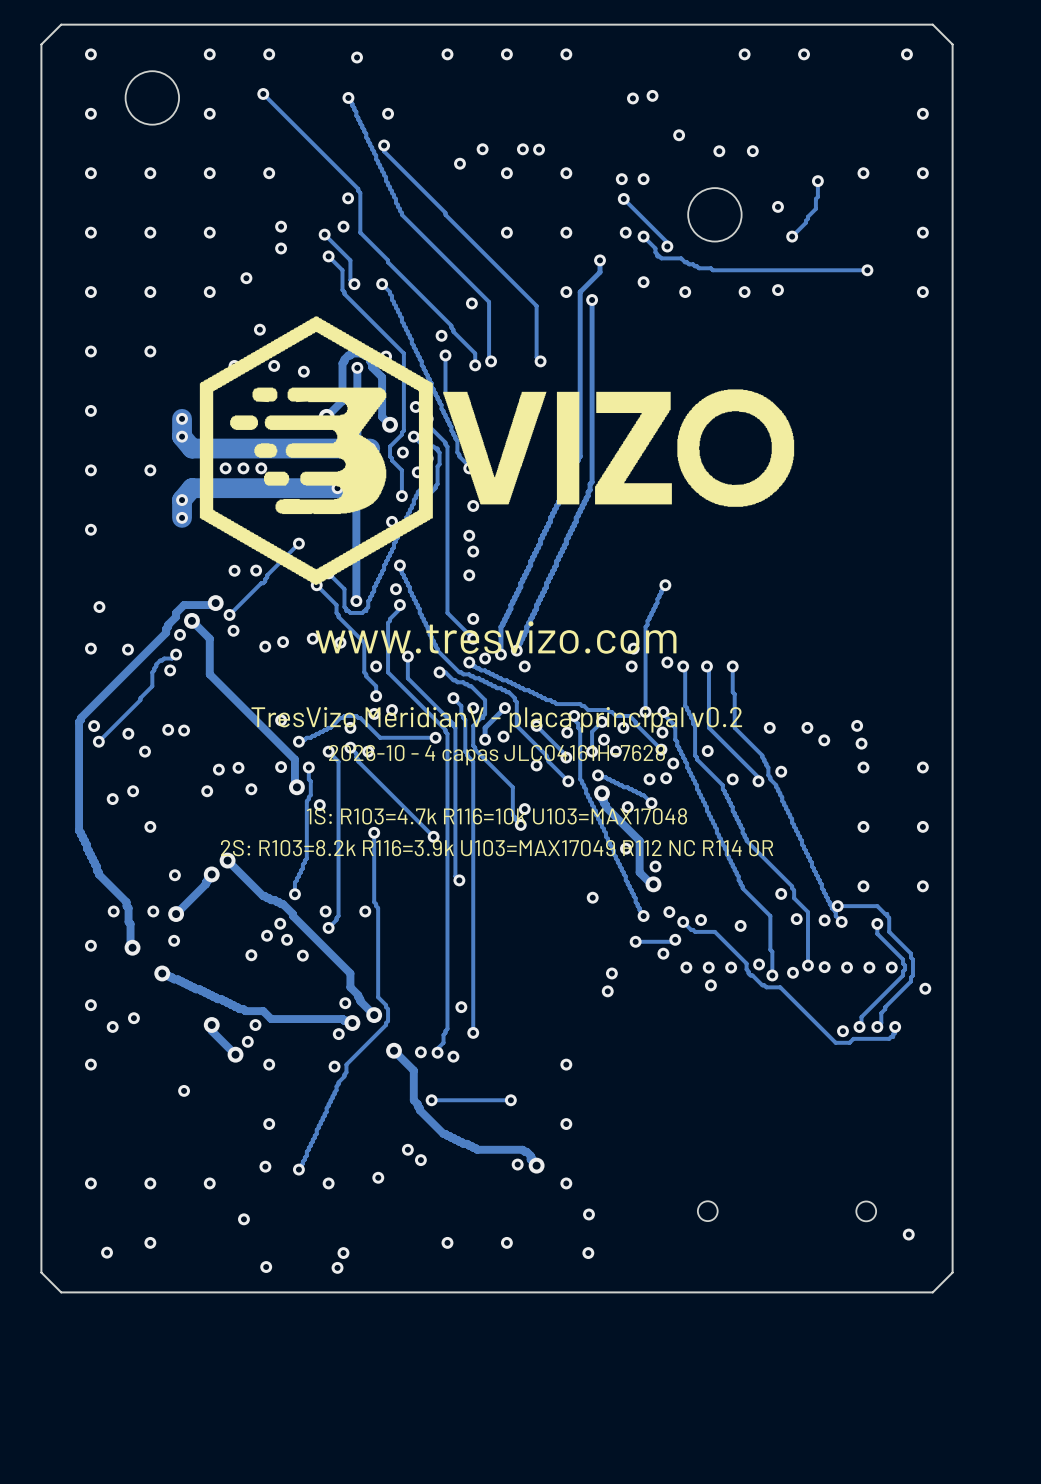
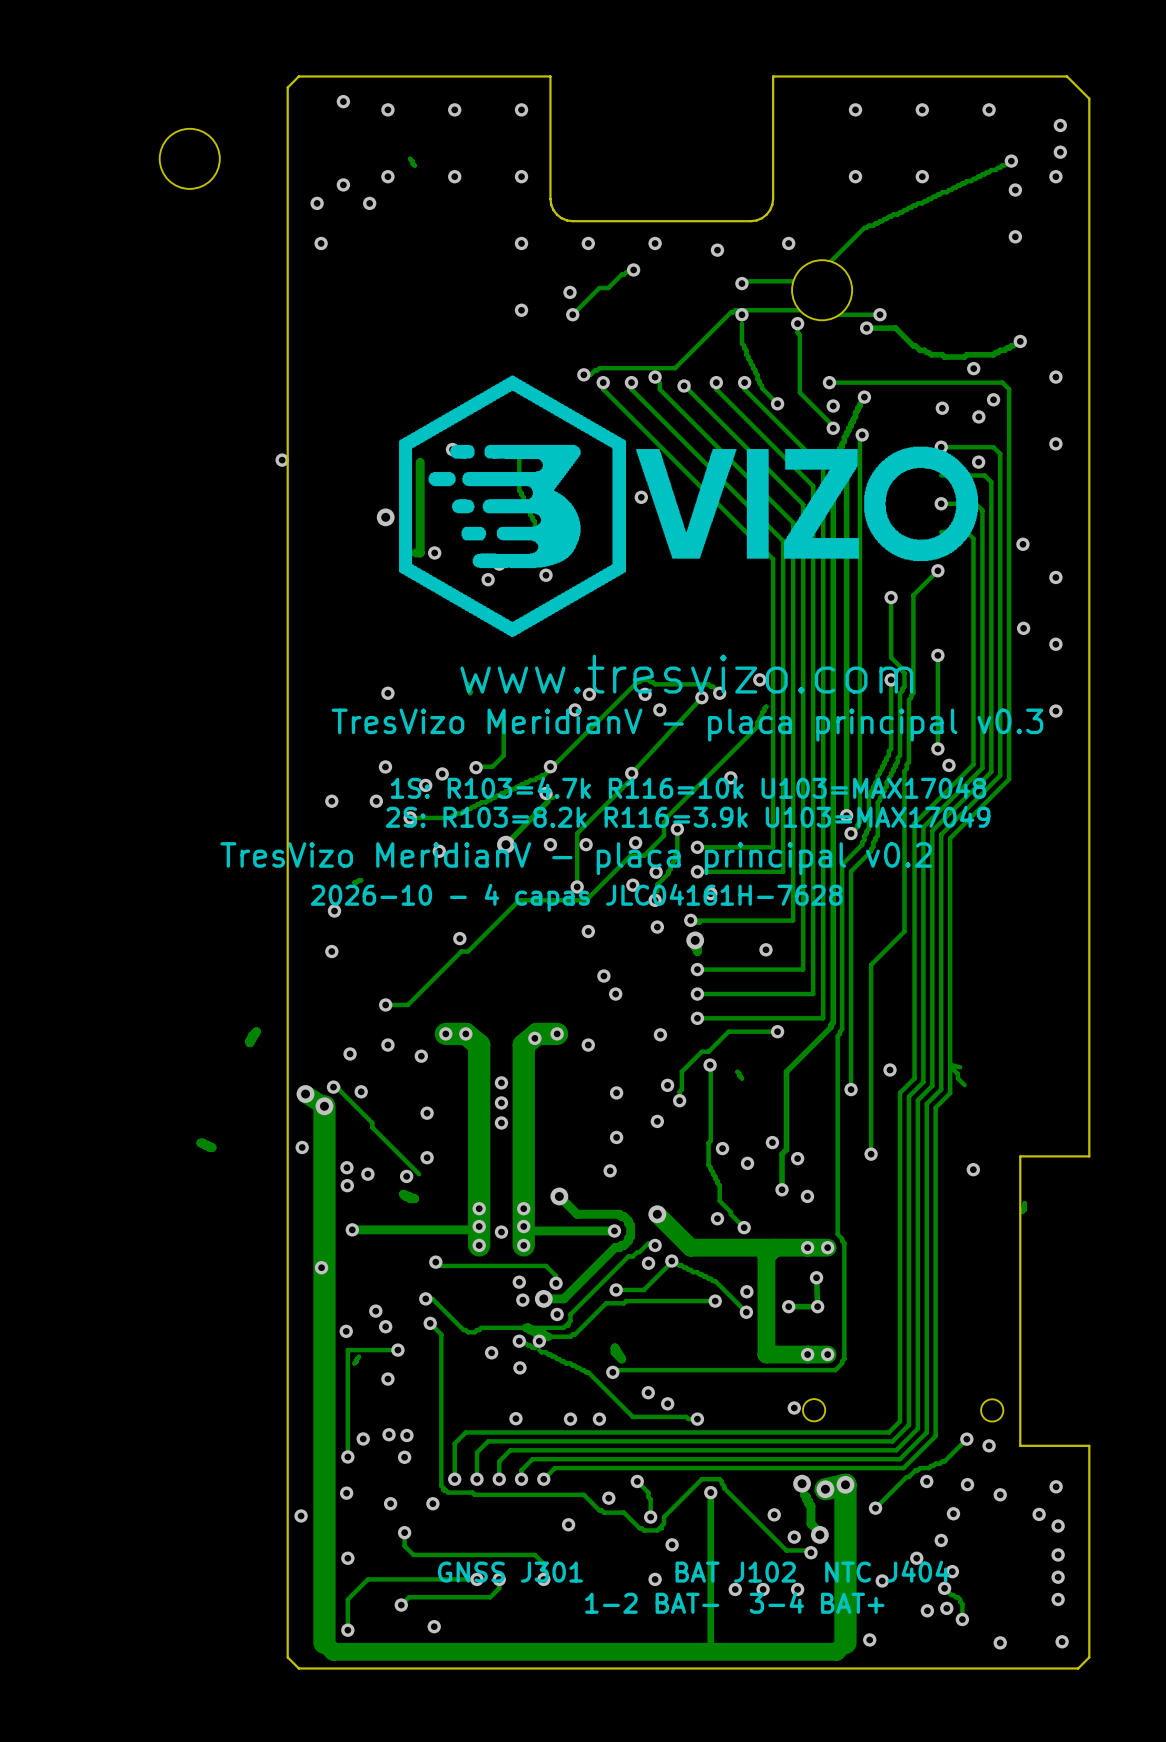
board edge: (249, 24) (61, 24) (41, 44) (41, 1272) (61, 1292) (932, 1292) (952, 1272) -> (298, 76) (287, 87) (287, 1657) (298, 1668) (1078, 1668) (1089, 1657) (1089, 1479)
board edge: (671, 24) (473, 24) -> (773, 76) (772, 204) (766, 214) (761, 218) (750, 221) (572, 221) (561, 218) (553, 210) (550, 198) (550, 76)
via: (90, 54) -> none
via: (209, 54) -> none
via position: (269, 54) -> (343, 101)
via: none -> (387, 109)
via: none -> (454, 109)
via: (506, 54) -> none
via: (566, 54) -> none
via: none -> (989, 109)
via: (906, 54) -> none
via: (357, 57) -> none
via: none -> (1060, 125)
via: none -> (1060, 152)
track: (263, 93) (358, 189) (360, 193) (360, 232) (451, 325) (453, 331) (475, 353) (475, 365) -> none
via: (263, 93) -> none
via: (652, 95) -> none
via: (348, 97) -> none
via: (632, 98) -> none
via: none -> (1011, 161)
track: (352, 103) (401, 214) (489, 301) (489, 359) (491, 361) -> none
track: none -> (1004, 165) (991, 170) (971, 181) (966, 181) (946, 192) (942, 192) (922, 203) (917, 203) (897, 214) (893, 214) (873, 225) (864, 227) (810, 281) (748, 281)
via: (90, 113) -> none
via: (209, 113) -> none
via: none -> (387, 176)
via: none -> (521, 176)
via: none -> (855, 176)
via: none -> (922, 176)
via: none -> (343, 184)
via: none -> (1015, 190)
via: (679, 135) -> none
via: none -> (317, 203)
via: none -> (369, 203)
track: (384, 145) (384, 151) (536, 305) (536, 357) (540, 361) -> none
via: (384, 145) -> none
via: (482, 149) -> none
via: (522, 149) -> none
via: (539, 149) -> none
via: (719, 151) -> none
via: (752, 151) -> none
via position: (459, 163) -> (521, 243)
via: none -> (1015, 236)
via: (90, 173) -> none
via: (150, 173) -> none
via: (209, 173) -> none
via: none -> (788, 243)
via: (863, 173) -> none
via: (922, 173) -> none
via: (643, 179) -> none
track: (817, 181) (815, 208) (808, 216) (806, 222) (792, 236) -> none
via: (817, 181) -> none
track: none -> (633, 269) (621, 274) (608, 288) (599, 288) (572, 314)
via: none -> (633, 269)
via: (348, 198) -> none
track: (623, 198) (667, 242) (667, 246) -> none
via: (623, 198) -> none
via: (777, 206) -> none
via: none -> (741, 283)
via: none -> (570, 292)
via: (281, 226) -> none
via: (343, 226) -> none
via: (90, 232) -> none
via: (150, 232) -> none
via: (209, 232) -> none
via: none -> (521, 310)
via: (506, 232) -> none
via: (566, 232) -> none
via: (625, 232) -> none
via: (922, 232) -> none
track: (324, 234) (350, 260) (350, 280) (354, 284) -> none
via: (324, 234) -> none
via: none -> (572, 314)
track: (643, 236) (655, 248) (657, 256) (661, 258) (681, 258) (685, 262) (699, 268) (710, 268) (712, 270) (808, 270) -> (866, 328) (895, 328) (913, 345) (926, 352)
track: none -> (880, 314) (810, 314) (804, 310) (735, 310) (675, 368) (599, 368) (590, 374) (583, 374)
via: none -> (880, 314)
via: (792, 236) -> none
track: none -> (741, 323) (741, 343) (746, 350) (746, 354) (757, 374) (761, 388) (777, 403)
track: none -> (797, 323) (797, 332) (799, 334) (799, 392) (833, 426) (833, 428)
via: none -> (797, 323)
via: (667, 246) -> none
via: (281, 248) -> none
via: none -> (866, 328)
track: (328, 256) (342, 270) (342, 290) (344, 294) (403, 353) (403, 430) (390, 446) (392, 460) (401, 470) (401, 496) -> none
via: (328, 256) -> none
track: (600, 260) (600, 272) (580, 292) (580, 456) (514, 599) -> (719, 693) (708, 684) (655, 684) (648, 679) (641, 679) (597, 722)
via: (600, 260) -> none
via: none -> (1020, 341)
track: (867, 270) (809, 270) -> (1013, 345) (993, 354) (944, 357) (942, 354) (931, 354) (928, 352)
via: (867, 270) -> none
via: (246, 278) -> none
via: (643, 282) -> none
via: (354, 284) -> none
track: (382, 284) (392, 296) (392, 299) (441, 404) (441, 408) (451, 426) (451, 430) (457, 440) (457, 452) (469, 468) -> none
via: (382, 284) -> none
via: none -> (973, 368)
drawing: none -> [399, 375, 978, 638]
via: none -> (583, 374)
via: (777, 290) -> none
via: (90, 292) -> none
via: (150, 292) -> none
via: (209, 292) -> none
via: (685, 292) -> none
via: (744, 292) -> none
track: none -> (603, 382) (603, 389) (773, 559) (773, 847) (697, 847)
via: none -> (603, 382)
track: none -> (631, 382) (631, 389) (783, 540) (783, 871) (697, 871)
via: none -> (631, 382)
track: none -> (688, 382) (688, 389) (803, 504) (803, 969) (697, 969)
track: none -> (716, 382) (716, 389) (813, 486) (813, 955)
via: none -> (716, 382)
track: none -> (744, 382) (744, 389) (823, 467) (823, 1018) (697, 1018)
via: none -> (744, 382)
track: none -> (829, 382) (1002, 382) (1009, 389) (1009, 779) (950, 838) (950, 1093) (935, 1107) (935, 1436) (903, 1468) (554, 1468) (543, 1479)
via: none -> (829, 382)
track: (592, 299) (592, 482) (588, 496) (576, 517) (576, 521) (518, 644) -> none
via: (471, 303) -> none
via: none -> (864, 397)
via: none -> (993, 399)
via: none -> (777, 403)
drawing: [199, 316, 795, 585] -> none
via: none -> (833, 406)
via: none -> (942, 408)
via: none -> (978, 416)
via: (259, 329) -> none
via: (441, 335) -> none
via: none -> (833, 428)
track: none -> (862, 434) (859, 437) (859, 822) (851, 833)
via: none -> (862, 434)
via: (90, 351) -> none
via: (150, 351) -> none
via: none -> (1055, 443)
via: none -> (941, 447)
via: (445, 355) -> none
via: (491, 361) -> none
via: (540, 361) -> none
via: (274, 365) -> none
via: (475, 365) -> none
via: (357, 367) -> none
via: none -> (978, 462)
via: (303, 371) -> none
track: none -> (846, 468) (846, 815)
track: none -> (941, 475) (984, 475) (991, 482) (991, 771) (932, 830) (932, 1085) (917, 1100) (917, 1428) (896, 1450) (510, 1450) (499, 1461) (499, 1479)
via: none -> (641, 497)
track: none -> (941, 503) (975, 503) (982, 510) (982, 768) (923, 827) (923, 1082) (908, 1096) (908, 1425) (892, 1441) (488, 1441) (476, 1452) (476, 1479)
via: none -> (941, 503)
via: (415, 406) -> none
via: (90, 410) -> none
track: (326, 416) (342, 401) (342, 363) (344, 359) (352, 353) (362, 353) (370, 359) (372, 367) (382, 377) (382, 416) (390, 424) -> none
track: (182, 418) (182, 436) (191, 448) (370, 448) -> none
via: (182, 418) -> none
track: (427, 418) (427, 424) (447, 446) (447, 612) (473, 638) -> none
via: (390, 424) -> none
track: none -> (941, 532) (966, 532) (973, 538) (973, 764) (914, 823) (914, 1078) (900, 1092) (900, 1421) (888, 1432) (465, 1432) (454, 1443) (454, 1479)
via: (182, 436) -> none
track: (413, 436) (423, 446) (433, 446) (439, 452) (437, 484) (425, 498) (421, 509) -> none
via: (413, 436) -> none
via: none -> (1022, 544)
via: (402, 452) -> none
track: (427, 458) (429, 460) (429, 478) (413, 500) (413, 504) (368, 601) (366, 610) (362, 612) (346, 610) (344, 607) (344, 589) (328, 573) -> none
track: none -> (937, 570) (913, 595) (913, 693) (908, 699) (908, 762) (904, 771) (904, 931) (871, 964) (871, 1154)
via: none -> (937, 570)
via: (225, 468) -> none
via: (243, 468) -> none
via: (261, 468) -> none
via: (90, 470) -> none
via: (150, 470) -> none
via: none -> (1055, 577)
via: (337, 488) -> none
track: (356, 488) (356, 601) -> none
track: (370, 488) (191, 488) (182, 500) (182, 517) -> none
via: none -> (891, 597)
via: (401, 496) -> none
via: (182, 500) -> none
via: (473, 506) -> none
via: none -> (1023, 628)
via: (182, 517) -> none
via: (392, 521) -> none
via: (90, 529) -> none
via: none -> (1055, 644)
via: (469, 535) -> none
track: none -> (937, 655) (937, 748)
via: none -> (937, 655)
track: (298, 543) (267, 575) (265, 581) (229, 614) -> none
via: (298, 543) -> none
via: (473, 551) -> none
via: none -> (759, 679)
via: none -> (891, 679)
via: (399, 565) -> none
via: (234, 570) -> none
via: (256, 570) -> none
track: (401, 573) (437, 650) (459, 672) (479, 678) (508, 692) (516, 702) (516, 725) (546, 755) (548, 761) (568, 781) -> none
via: none -> (719, 693)
via: none -> (589, 694)
via: none -> (645, 694)
via: (469, 575) -> none
track: none -> (701, 697) (631, 773) (630, 780)
via: none -> (701, 697)
track: (316, 585) (336, 605) (338, 616) (364, 642) (364, 672) (376, 686) (376, 696) -> none
via: (316, 585) -> none
via: (665, 585) -> none
via: none -> (574, 709)
via: none -> (659, 709)
via: (395, 589) -> none
via: none -> (1055, 711)
track: none -> (503, 719) (503, 755) (492, 766) (476, 766)
text: none -> TresVizo MeridianV - placa principal v0.3 (687, 725)
via: (356, 601) -> none
track: (512, 601) (510, 609) (500, 626) (500, 654) -> (594, 724) (543, 775) (450, 817) (410, 817)
track: (215, 603) (213, 605) (184, 605) (168, 624) (166, 632) (79, 721) (79, 830) (98, 874) (126, 902) (132, 947) -> none
via: (215, 603) -> none
track: (399, 605) (399, 609) (388, 622) (388, 672) (447, 733) (447, 1028) (443, 1034) (443, 1042) (437, 1048) (437, 1052) -> none
via: (399, 605) -> none
track: (655, 605) (645, 626) (645, 712) -> (755, 728) (666, 817) (664, 822) (664, 835) (643, 855) (630, 855) (588, 898) (583, 900) (519, 900) (468, 951) (461, 951) (407, 1004) (385, 1004)
via: (99, 607) -> none
via: (229, 614) -> none
via: (473, 618) -> none
track: (191, 620) (209, 638) (209, 674) (294, 759) (294, 785) (296, 787) -> none
via: (191, 620) -> none
via: none -> (937, 748)
via: (233, 630) -> none
via: (180, 634) -> none
text position: www.tresvizo.com (496, 637) -> www.tresvizo.com (686, 674)
via: none -> (948, 765)
via: (312, 638) -> none
via: none -> (385, 766)
via: none -> (476, 767)
via: (283, 642) -> none
via: (340, 642) -> none
via: none -> (631, 773)
via: none -> (442, 773)
via: (265, 646) -> none
via: (90, 648) -> none
via: (127, 649) -> none
via: (516, 650) -> none
track: none -> (630, 780) (577, 833) (577, 886)
track: (176, 654) (172, 658) (164, 658) (156, 664) (152, 672) (152, 686) (98, 741) -> none
via: (176, 654) -> none
via: (500, 654) -> none
via: none -> (425, 785)
track: (407, 656) (407, 678) (455, 727) (455, 876) (459, 880) -> none
via: (407, 656) -> none
via: (485, 658) -> none
via: (667, 662) -> none
via: (376, 666) -> none
track: (475, 666) (556, 704) (580, 704) (588, 710) (607, 710) (615, 715) (629, 715) (661, 749) -> none
via: (524, 666) -> none
via: (631, 666) -> none
track: (683, 666) (685, 668) (685, 706) (689, 712) -> (659, 382) (659, 389) (793, 522) (793, 849)
via: (683, 666) -> none
track: (706, 666) (708, 668) (708, 727) (758, 777) (758, 781) -> none
via: (706, 666) -> none
track: (732, 666) (734, 727) (762, 755) (768, 767) (768, 775) (782, 797) (782, 801) (792, 818) (792, 822) (829, 904) -> none
via: (732, 666) -> none
via: none -> (331, 801)
via: none -> (376, 801)
track: none -> (548, 801) (505, 844)
via: (170, 670) -> none
track: (439, 672) (445, 672) (453, 680) (471, 686) (485, 700) (485, 713) (473, 725) (473, 745) (512, 787) (512, 815) (520, 824) -> none
via: (439, 672) -> none
via: none -> (846, 815)
text: none -> 2S: R103=8.2k R116=3.9k U103=MAX17049 (688, 816)
via: none -> (410, 817)
track: none -> (677, 829) (677, 853) (668, 873) (657, 884) (657, 891)
via: none -> (677, 829)
via: (376, 696) -> none
track: (453, 698) (461, 706) (461, 713) (465, 719) (465, 751) (473, 761) (473, 1032) -> none
via: (453, 698) -> none
via: none -> (851, 833)
via: none -> (635, 842)
via: none -> (505, 844)
track: (504, 708) (485, 727) (485, 739) -> none
via: (392, 710) -> none
via: none -> (697, 847)
via: (645, 712) -> none
track: (663, 712) (675, 727) (677, 745) (689, 769) -> (793, 851) (793, 913)
via: (663, 712) -> none
track: (689, 713) (695, 725) (695, 755) (722, 785) (724, 791) -> (859, 403) (855, 417) (844, 437) (844, 441) (833, 461) (833, 938)
track: (574, 715) (574, 719) (580, 729) (580, 779) (639, 910) -> none
via: (574, 715) -> none
via: (281, 720) -> none
track: (601, 721) (592, 731) (592, 751) -> none
via: (601, 721) -> none
track: (536, 725) (566, 757) -> none
via: (536, 725) -> none
via: (857, 725) -> none
via: (94, 726) -> none
via: (350, 727) -> none
via: (623, 727) -> none
via: (769, 727) -> none
via: (807, 727) -> none
via: (168, 729) -> none
via: (184, 730) -> none
via: none -> (697, 871)
via: (662, 732) -> none
via: (128, 733) -> none
via: (503, 736) -> none
track: (435, 737) (380, 737) (360, 717) (344, 715) (330, 727) (304, 739) -> none
via: (435, 737) -> none
via: (485, 739) -> none
via: (603, 739) -> none
via: (824, 740) -> none
via: (98, 741) -> none
via: (298, 741) -> none
via: (861, 743) -> none
via: none -> (632, 885)
via: none -> (577, 886)
track: (350, 747) (356, 753) (358, 761) (433, 836) -> none
via: (350, 747) -> none
via: (661, 749) -> none
via: (145, 751) -> none
track: (328, 751) (338, 761) (338, 916) (328, 927) -> none
via: (328, 751) -> none
via: (368, 751) -> none
via: (592, 751) -> none
via: (707, 751) -> none
via: (673, 763) -> none
via: (536, 765) -> none
via: (238, 767) -> none
track: (308, 767) (310, 795) (306, 801) (306, 858) (294, 882) (294, 894) -> none
via: (308, 767) -> none
via: (863, 767) -> none
via: (922, 767) -> none
via: (218, 769) -> none
track: (689, 771) (706, 807) -> (793, 915) (793, 920) (697, 920)
via: (781, 771) -> none
track: (605, 777) (643, 795) (651, 803) -> none
via: (666, 778) -> none
via: (649, 779) -> none
via: (732, 779) -> none
via: (758, 781) -> none
via: none -> (588, 931)
via: (296, 787) -> none
via: (251, 789) -> none
via: (133, 791) -> none
via: (207, 791) -> none
via: none -> (459, 938)
track: (724, 793) (732, 807) -> (891, 679) (891, 748) (868, 795) (868, 829) (864, 835) (864, 840) (842, 864) (842, 955)
via: (112, 799) -> none
via: none -> (765, 949)
via: none -> (331, 951)
track: (603, 803) (639, 840) (639, 872) (653, 884) -> none
via: (651, 803) -> none
via: (319, 805) -> none
via: (627, 807) -> none
via: (524, 809) -> none
track: (706, 811) (724, 846) -> (833, 940) (833, 1000)
track: none -> (813, 960) (813, 994) (697, 994)
track: (732, 811) (740, 824) -> (891, 597) (891, 657) (904, 673) (904, 686) (900, 693) (900, 755) (877, 802) (877, 835) (873, 842) (873, 846) (851, 871) (851, 976)
text position: 1S: R103=4.7k R116=10k U103=MAX17048 (496, 816) -> 1S: R103=4.7k R116=10k U103=MAX17048 (688, 787)
via: none -> (697, 969)
via: (150, 826) -> none
track: (740, 826) (746, 840) (792, 886) (794, 898) (808, 912) (808, 938) -> (941, 447) (993, 447) (1000, 453) (1000, 775) (941, 834) (941, 1089) (926, 1103)
via: (863, 826) -> none
via: (922, 826) -> none
track: (374, 832) (374, 902) (378, 908) (378, 997) (388, 1009) (388, 1021) (346, 1064) (346, 1072) (336, 1086) (336, 1090) (326, 1108) (326, 1112) (316, 1129) (316, 1133) (302, 1163) -> none
via: (374, 832) -> none
via: (433, 836) -> none
via: none -> (615, 994)
via: none -> (697, 994)
text: 2S: R103=8.2k R116=3.9k U103=MAX17049 R112 NC R114 0R (497, 848) -> none
via: (625, 848) -> none
track: (724, 848) (732, 864) -> (842, 960) (842, 1020)
track: none -> (833, 1002) (833, 1022) (831, 1027) (786, 1071) (786, 1149) (782, 1154) (782, 1189)
via: none -> (385, 1004)
track: (227, 860) (263, 896) (283, 904) (350, 973) (350, 987) (358, 995) (360, 1001) (374, 1015) -> none
via: (227, 860) -> none
via: none -> (697, 1018)
via: (655, 866) -> none
track: (732, 866) (740, 882) -> (851, 978) (851, 1040)
track: none -> (842, 1022) (842, 1029) (837, 1036) (837, 1234) (844, 1243) (844, 1359) (842, 1363) (835, 1370) (615, 1370) (612, 1372)
via: (211, 874) -> none
track: none -> (777, 1031) (728, 1031) (708, 1051) (701, 1051) (681, 1071) (679, 1100)
via: none -> (777, 1031)
via: (174, 875) -> none
track: none -> (445, 1033) (465, 1033) (479, 1045) (479, 1245)
via: none -> (445, 1033)
via: none -> (465, 1033)
track: none -> (557, 1033) (537, 1033) (523, 1045) (523, 1245)
via: none -> (557, 1033)
via: none -> (660, 1034)
track: (205, 884) (176, 914) -> none
via: (653, 884) -> none
track: (740, 884) (770, 916) (772, 975) -> (851, 1042) (851, 1085)
via: none -> (387, 1045)
via: none -> (588, 1045)
via: (863, 886) -> none
via: (922, 886) -> none
via: (781, 893) -> none
via: (592, 897) -> none
track: none -> (710, 1065) (710, 1140) (708, 1143) (708, 1165) (719, 1185) (719, 1200) (744, 1227)
via: none -> (710, 1065)
via: (837, 906) -> none
via: none -> (890, 1069)
via: (113, 911) -> none
via: (153, 911) -> none
via: (325, 911) -> none
via position: (365, 911) -> (421, 1056)
via: (669, 912) -> none
track: (835, 912) (837, 906) (877, 906) (889, 918) (889, 931) (911, 953) (912, 959) (911, 981) (885, 1007) (881, 1013) (881, 1023) (877, 1026) -> none
via: (176, 914) -> none
via: (643, 916) -> none
via: (796, 919) -> none
via: none -> (501, 1082)
via: (701, 920) -> none
via: (824, 920) -> none
track: (683, 921) (695, 931) (714, 931) (746, 963) (746, 969) (750, 975) (766, 987) (780, 987) (835, 1042) (849, 1042) (853, 1038) (889, 1038) (893, 1034) -> none
via: (683, 921) -> none
via: (841, 921) -> none
via: none -> (667, 1085)
track: none -> (338, 1087) (338, 1089) (372, 1122) (372, 1127) (419, 1174)
track: (877, 923) (877, 933) (903, 959) (905, 969) (903, 975) (861, 1017) (861, 1024) (859, 1026) -> none
via: (877, 923) -> none
via: none -> (361, 1091)
via: (328, 927) -> none
via: none -> (616, 1092)
track: none -> (305, 1094) (324, 1106) (324, 1642) (333, 1651) (836, 1651) (845, 1642) (845, 1484) (825, 1489)
via: none -> (305, 1094)
via: (267, 935) -> none
via: none -> (679, 1100)
via: none -> (501, 1102)
via: (287, 939) -> none
track: (675, 939) (673, 941) (635, 941) -> none
via: (675, 939) -> none
via: (174, 940) -> none
via: none -> (324, 1106)
via: (635, 941) -> none
via: (90, 945) -> none
via: none -> (427, 1113)
via: (132, 947) -> none
via: (663, 953) -> none
via: none -> (657, 1121)
via: (251, 955) -> none
via: (302, 955) -> none
via: none -> (501, 1122)
via: (759, 964) -> none
track: none -> (926, 1134) (926, 1432) (899, 1459) (532, 1459) (521, 1470) (521, 1479)
via: (808, 965) -> none
via: (686, 967) -> none
via: (708, 967) -> none
via: (731, 967) -> none
via: (824, 967) -> none
via: (847, 967) -> none
via: (869, 967) -> none
via: (891, 967) -> none
via: none -> (616, 1137)
via: (792, 972) -> none
via: (162, 973) -> none
via: (611, 973) -> none
via: none -> (772, 1142)
via: (772, 975) -> none
track: (172, 977) (239, 1009) (263, 1011) (271, 1019) (342, 1019) -> none
via: none -> (302, 1147)
via: none -> (722, 1148)
via: none -> (871, 1154)
via: (710, 985) -> none
board edge: (952, 985) (952, 1242) -> (1089, 1156) (1020, 1156) (1020, 1445) (1089, 1445)
via: none -> (427, 1157)
via: none -> (797, 1158)
via: (925, 988) -> none
via: (607, 991) -> none
via: none -> (747, 1163)
via: none -> (346, 1167)
via: none -> (973, 1169)
via: none -> (610, 1170)
via: none -> (367, 1174)
via: (90, 1005) -> none
via: (461, 1007) -> none
via: none -> (347, 1185)
via: (374, 1015) -> none
via: none -> (782, 1189)
via: (133, 1018) -> none
via: none -> (807, 1196)
track: none -> (559, 1196) (577, 1214) (619, 1214) (623, 1216) (630, 1225) (630, 1236) (623, 1245) (615, 1247) (563, 1298) (543, 1298)
via: (352, 1023) -> none
track: (211, 1024) (211, 1030) (235, 1054) -> none
via: (211, 1024) -> none
via: (255, 1025) -> none
via: (112, 1026) -> none
via: (859, 1026) -> none
via: (877, 1026) -> none
via: (895, 1026) -> none
via: none -> (479, 1208)
via: none -> (523, 1208)
via: (842, 1031) -> none
via position: (473, 1032) -> (559, 1196)
via: (338, 1034) -> none
track: none -> (657, 1214) (690, 1247) (827, 1247)
via: none -> (657, 1214)
via: none -> (717, 1218)
via: (247, 1041) -> none
via: none -> (479, 1226)
track: none -> (523, 1226) (523, 1230) (614, 1230)
via: none -> (523, 1226)
via: none -> (744, 1227)
via: none -> (352, 1229)
track: (394, 1050) (413, 1070) (413, 1100) (419, 1110) (443, 1133) (451, 1137) -> (425, 1298) (432, 1298) (468, 1332) (474, 1332) (481, 1327) (525, 1327)
via: (394, 1050) -> none
track: none -> (479, 1229) (352, 1229)
via: none -> (614, 1230)
via: (420, 1052) -> none
via: none -> (501, 1232)
via: (437, 1052) -> none
via: (235, 1054) -> none
via: (453, 1056) -> none
track: none -> (648, 1243) (639, 1252) (632, 1256) (628, 1256) (570, 1314) (568, 1325) (563, 1327) (528, 1327)
via: (90, 1064) -> none
via: (269, 1064) -> none
via: none -> (479, 1245)
via: none -> (523, 1245)
via: (334, 1066) -> none
track: none -> (775, 1247) (766, 1256) (766, 1354) (827, 1354)
via: none -> (807, 1247)
via: none -> (827, 1247)
via: none -> (671, 1261)
track: none -> (435, 1262) (439, 1265) (546, 1265) (556, 1275) (556, 1283)
via: none -> (435, 1262)
via: none -> (648, 1263)
via: none -> (321, 1267)
via: (184, 1090) -> none
track: none -> (816, 1277) (817, 1306) (788, 1306)
via: none -> (816, 1277)
via: none -> (519, 1282)
via: none -> (556, 1283)
via: (431, 1100) -> none
track: (510, 1100) (431, 1100) -> none
via: (510, 1100) -> none
track: none -> (616, 1289) (643, 1289) (671, 1261) (715, 1281) (746, 1312)
via: none -> (616, 1289)
via: none -> (746, 1291)
via: none -> (425, 1298)
via: none -> (543, 1298)
via: none -> (522, 1300)
via: none -> (715, 1301)
via: none -> (788, 1306)
via: none -> (817, 1306)
via: none -> (375, 1311)
via: (269, 1124) -> none
via: (566, 1124) -> none
via: none -> (746, 1312)
via: none -> (557, 1314)
track: none -> (430, 1323) (441, 1334) (441, 1485) (443, 1490) (448, 1492) (472, 1492) (474, 1494) (583, 1494) (603, 1512) (623, 1512) (639, 1528) (643, 1530) (657, 1530) (661, 1528) (664, 1523) (664, 1517) (701, 1479) (719, 1479) (724, 1488) (786, 1550) (808, 1550) (810, 1552)
via: none -> (430, 1323)
via: none -> (385, 1326)
via: none -> (346, 1331)
track: (471, 1145) (477, 1149) (522, 1149) (530, 1155) -> (548, 1336) (570, 1336) (574, 1334) (606, 1303) (623, 1303) (626, 1301) (715, 1301)
via: (407, 1149) -> none
via: none -> (519, 1341)
track: none -> (539, 1341) (534, 1347) (525, 1343)
via: none -> (539, 1341)
track: none -> (397, 1350) (347, 1350) (347, 1456)
via: none -> (397, 1350)
track: none -> (539, 1350) (588, 1372) (632, 1416) (686, 1416) (688, 1419) (697, 1419)
via: none -> (807, 1354)
via: none -> (827, 1354)
via position: (517, 1164) -> (612, 1372)
via: (536, 1165) -> none
via: (265, 1166) -> none
via: (298, 1169) -> none
via: none -> (519, 1367)
via: (378, 1177) -> none
via: (90, 1183) -> none
via: (150, 1183) -> none
via: (209, 1183) -> none
via: (566, 1183) -> none
via: none -> (648, 1392)
via: none -> (794, 1407)
via position: (588, 1214) -> (667, 1403)
via: none -> (515, 1418)
via: (243, 1219) -> none
via: none -> (570, 1419)
via: none -> (599, 1419)
via: none -> (697, 1419)
via: none -> (389, 1434)
via: none -> (406, 1435)
via: (908, 1234) -> none
via: none -> (363, 1438)
track: none -> (966, 1439) (944, 1461) (928, 1468) (920, 1468) (906, 1477) (875, 1508)
via: none -> (966, 1439)
via: (150, 1242) -> none
via: (447, 1242) -> none
via: (506, 1242) -> none
via: none -> (989, 1445)
via: (107, 1252) -> none
via: none -> (347, 1456)
via: (588, 1253) -> none
via: (266, 1267) -> none
via: (337, 1267) -> none
via: none -> (454, 1479)
via: none -> (476, 1479)
via: none -> (499, 1479)
via: none -> (521, 1479)
via: none -> (543, 1479)
track: none -> (637, 1481) (648, 1492) (650, 1499) (650, 1517)
via: none -> (637, 1481)
via: none -> (926, 1481)
via: none -> (802, 1483)
via: none -> (845, 1484)
via: none -> (967, 1484)
via: none -> (1056, 1486)
via: none -> (825, 1489)
via: none -> (346, 1493)
track: none -> (710, 1492) (710, 1651)
via: none -> (710, 1492)
track: none -> (804, 1494) (810, 1505) (810, 1523) (819, 1534)
via: none -> (1000, 1494)
via: none -> (608, 1498)
via: none -> (390, 1503)
via: none -> (432, 1503)
via: none -> (875, 1508)
via: none -> (953, 1513)
via: none -> (1039, 1514)
via: none -> (774, 1514)
via: none -> (301, 1515)
via: none -> (650, 1517)
via: none -> (568, 1524)
via: none -> (1058, 1526)
track: none -> (404, 1532) (404, 1546) (413, 1554) (534, 1554) (543, 1563) (543, 1579)
via: none -> (404, 1532)
via: none -> (819, 1534)
via: none -> (794, 1537)
via: none -> (941, 1540)
via: none -> (672, 1544)
via: none -> (810, 1552)
via: none -> (1058, 1554)
via: none -> (347, 1558)
via: none -> (916, 1558)
via: none -> (952, 1571)
text: none -> GNSS J301 (510, 1572)
text: none -> BAT J102 (735, 1572)
text: none -> NTC J404 (887, 1571)
via: none -> (1058, 1577)
track: none -> (476, 1579) (367, 1579) (347, 1599) (347, 1630)
via: none -> (476, 1579)
track: none -> (499, 1579) (499, 1588) (490, 1597) (409, 1597) (401, 1605)
via: none -> (499, 1579)
via: none -> (543, 1579)
via: none -> (655, 1579)
via: none -> (882, 1580)
track: none -> (944, 1588) (951, 1595) (960, 1599) (962, 1603) (962, 1619)
via: none -> (944, 1588)
via: none -> (735, 1589)
via: none -> (763, 1589)
via: none -> (797, 1589)
via: none -> (1058, 1599)
text: none -> 1-2 BAT- 3-4 BAT+ (734, 1602)
via: none -> (401, 1605)
via: none -> (946, 1608)
via: none -> (927, 1610)
via: none -> (962, 1619)
via: none -> (434, 1626)
via: none -> (347, 1630)
via: none -> (869, 1639)
via: none -> (1062, 1641)
via: none -> (1000, 1642)

